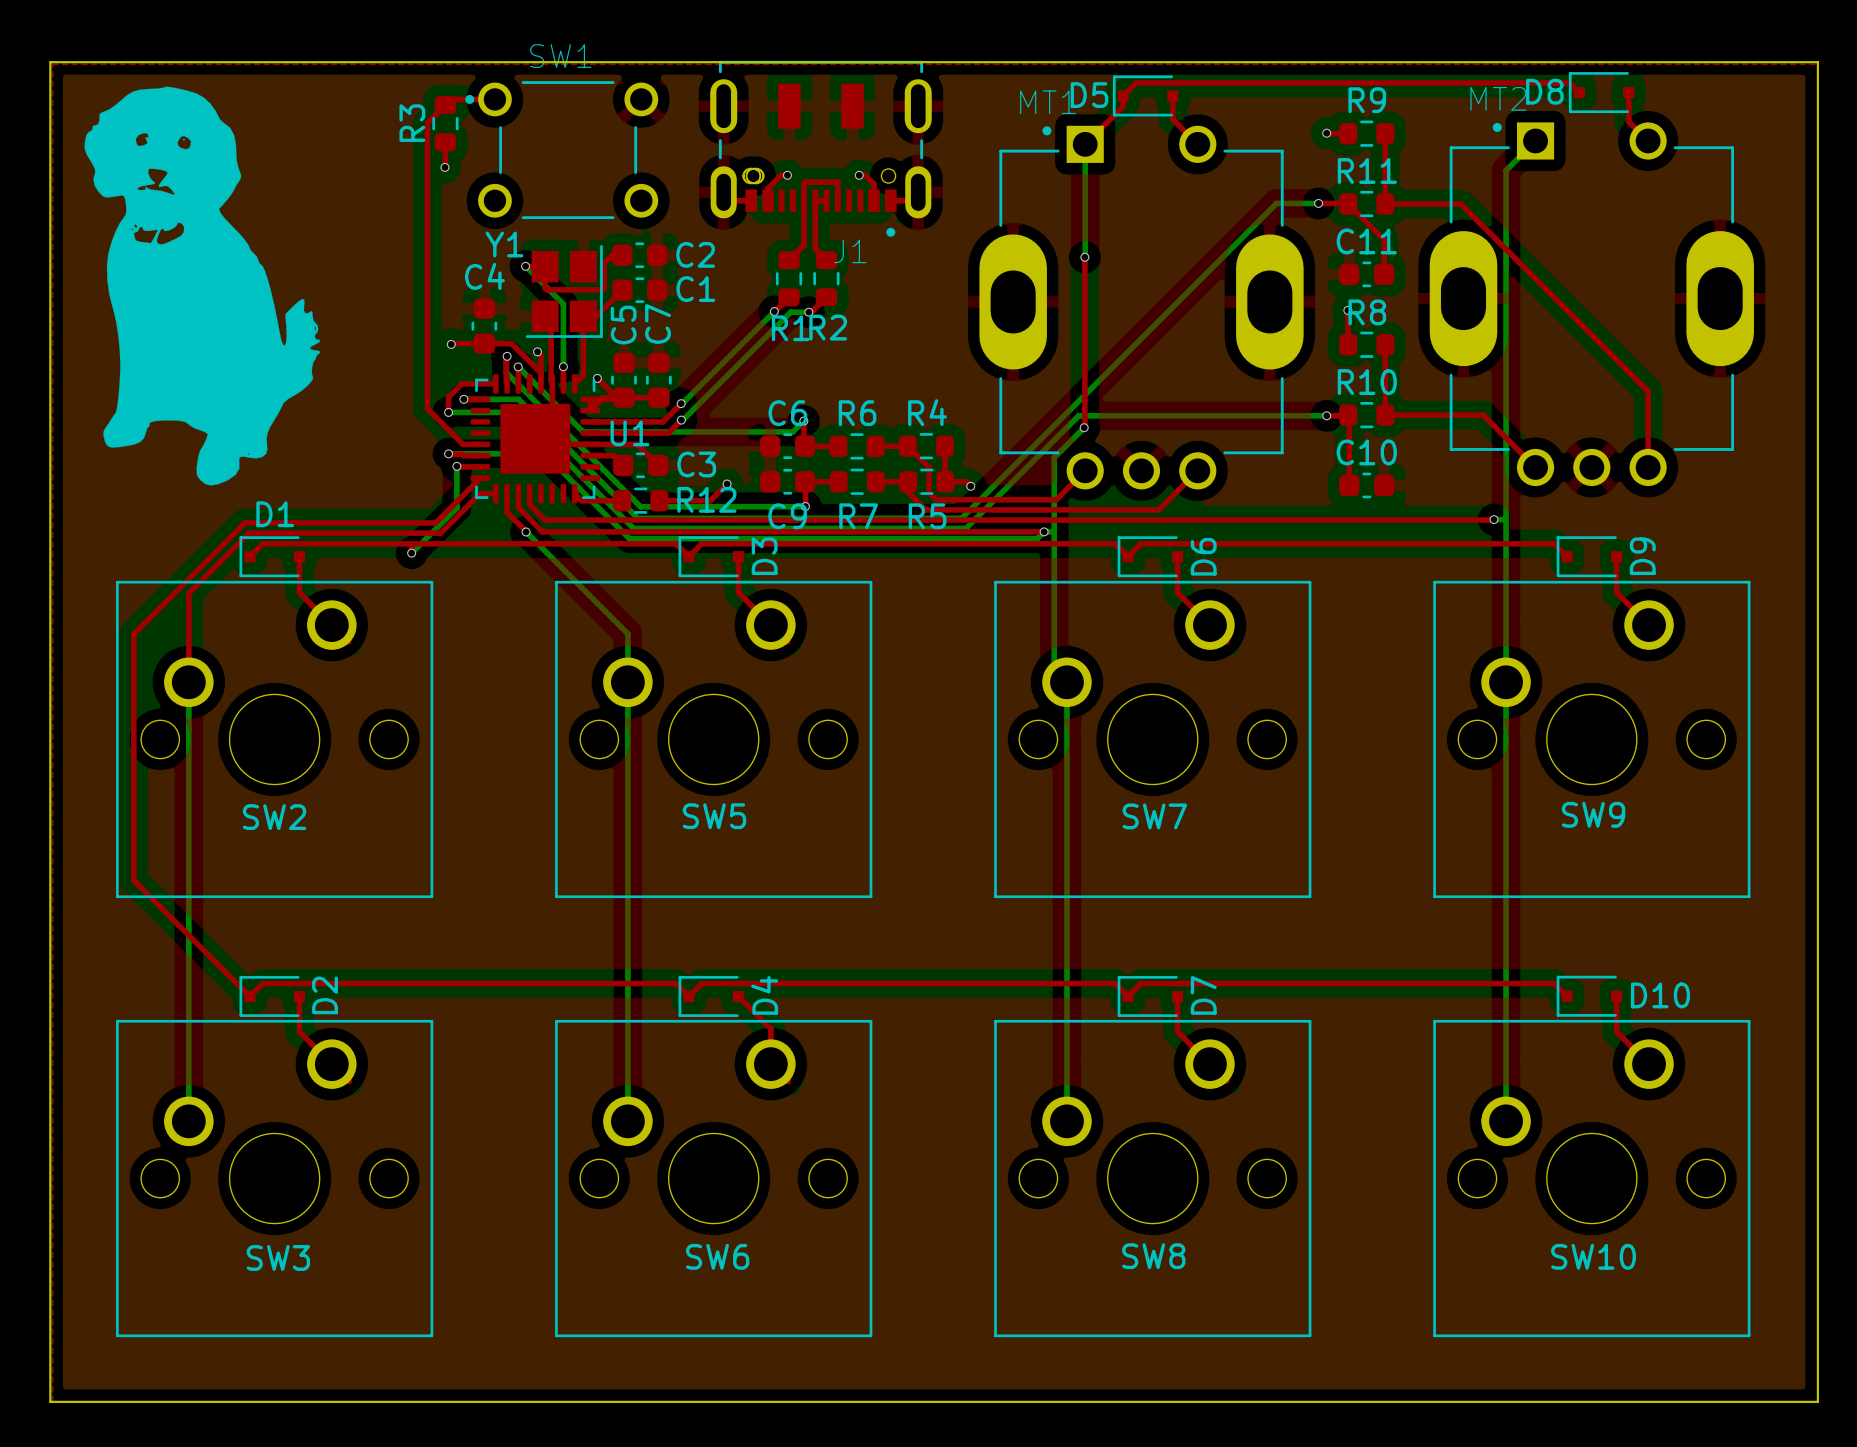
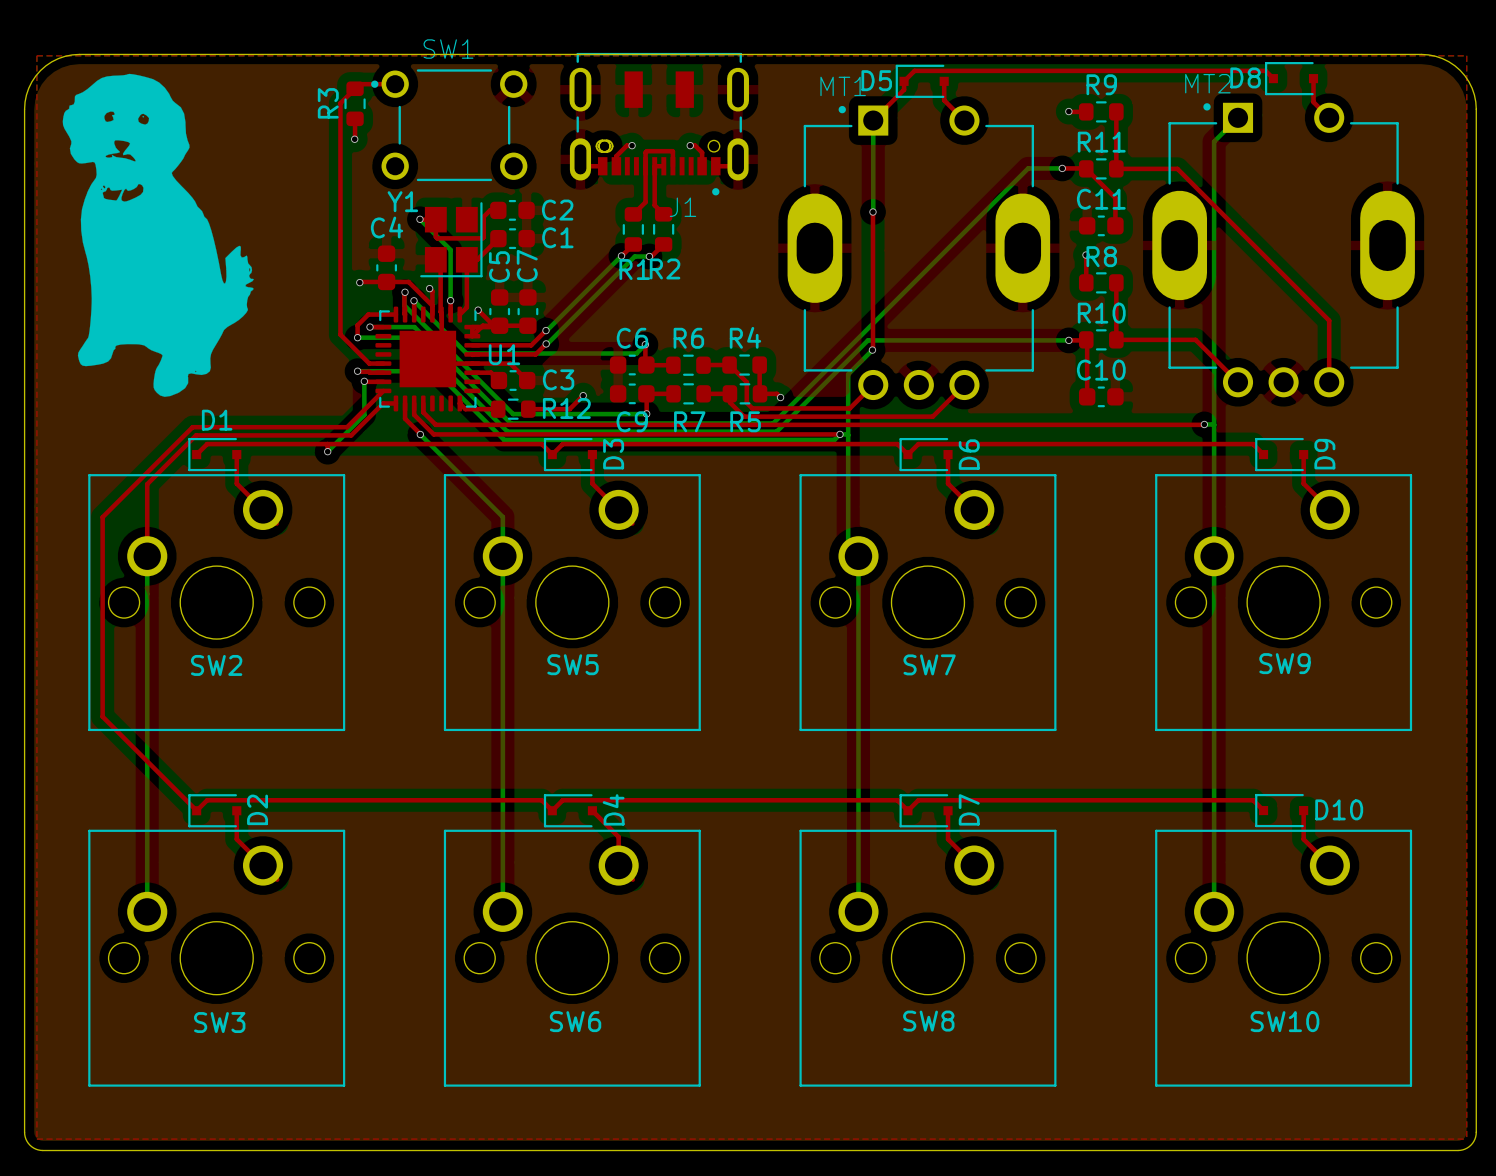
board edge: (50, 62) (1817, 62) (1817, 1401) (50, 1401) (50, 62) -> (79, 54) (58, 58) (40, 70) (28, 88) (24, 109) (24, 1132) (25, 1139) (31, 1146) (42, 1150) (1458, 1150) (1465, 1149) (1472, 1143) (1476, 1132) (1476, 109) (1472, 88) (1464, 75) (1454, 65) (1435, 56) (1421, 54) (79, 54)

